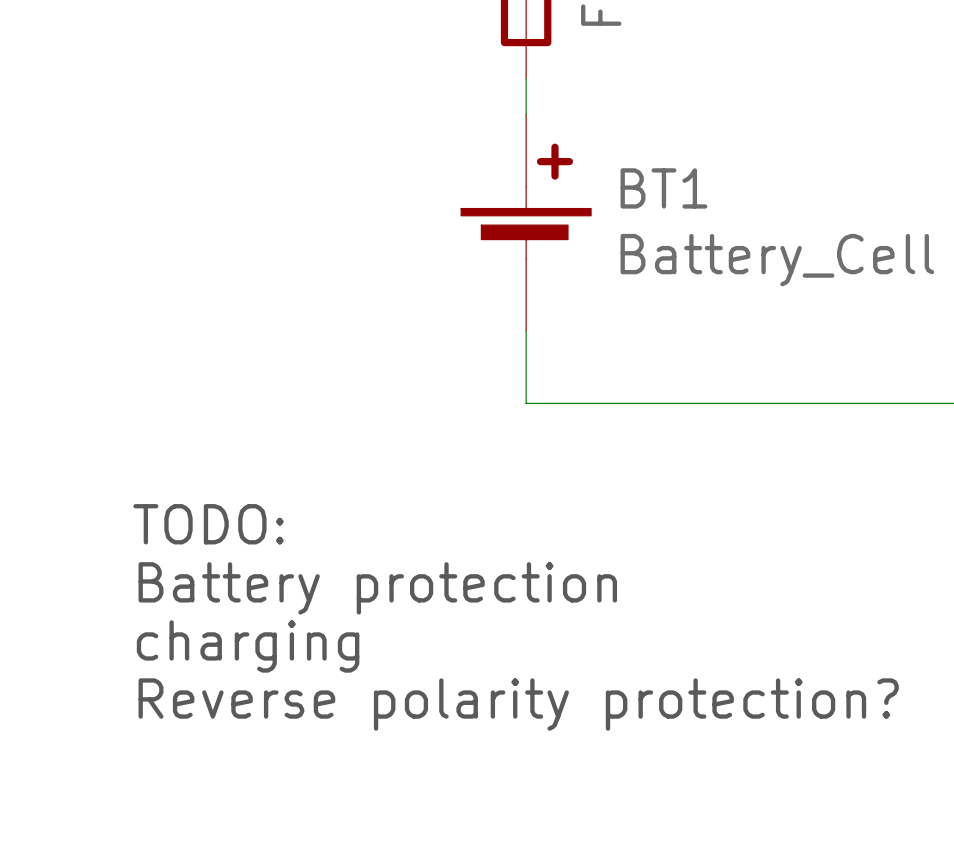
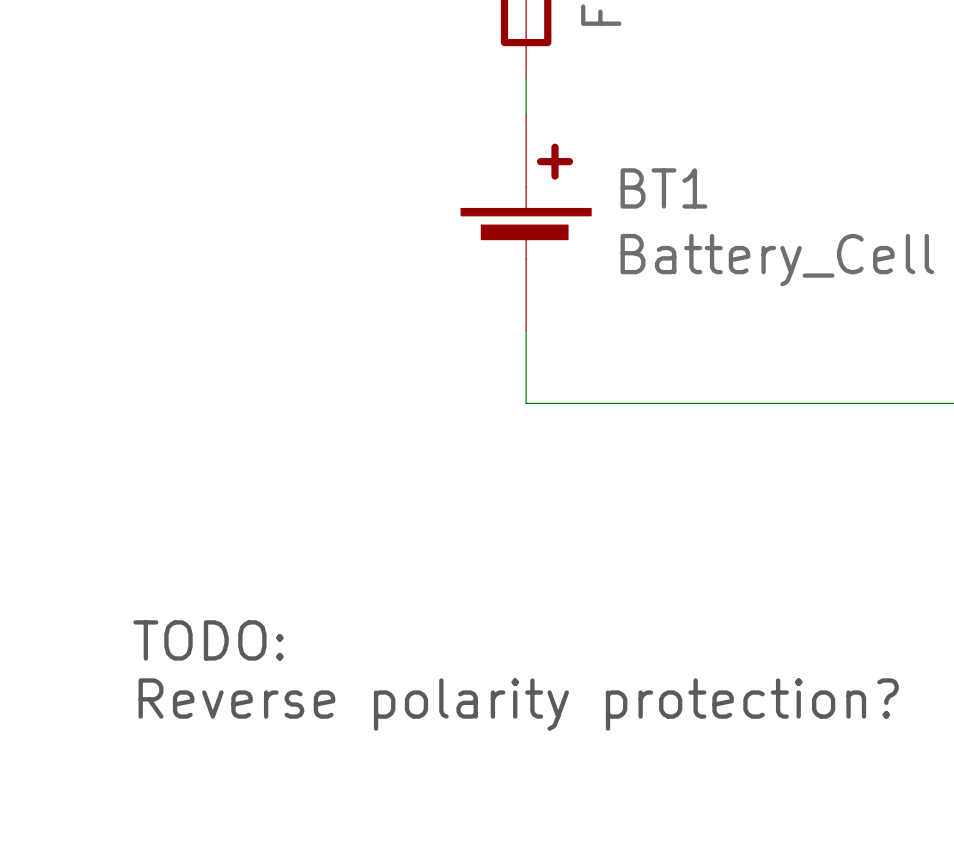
text: TODO: (208, 524) -> none
text: Battery protection (377, 588) -> none
text: charging (248, 646) -> TODO: (208, 640)

